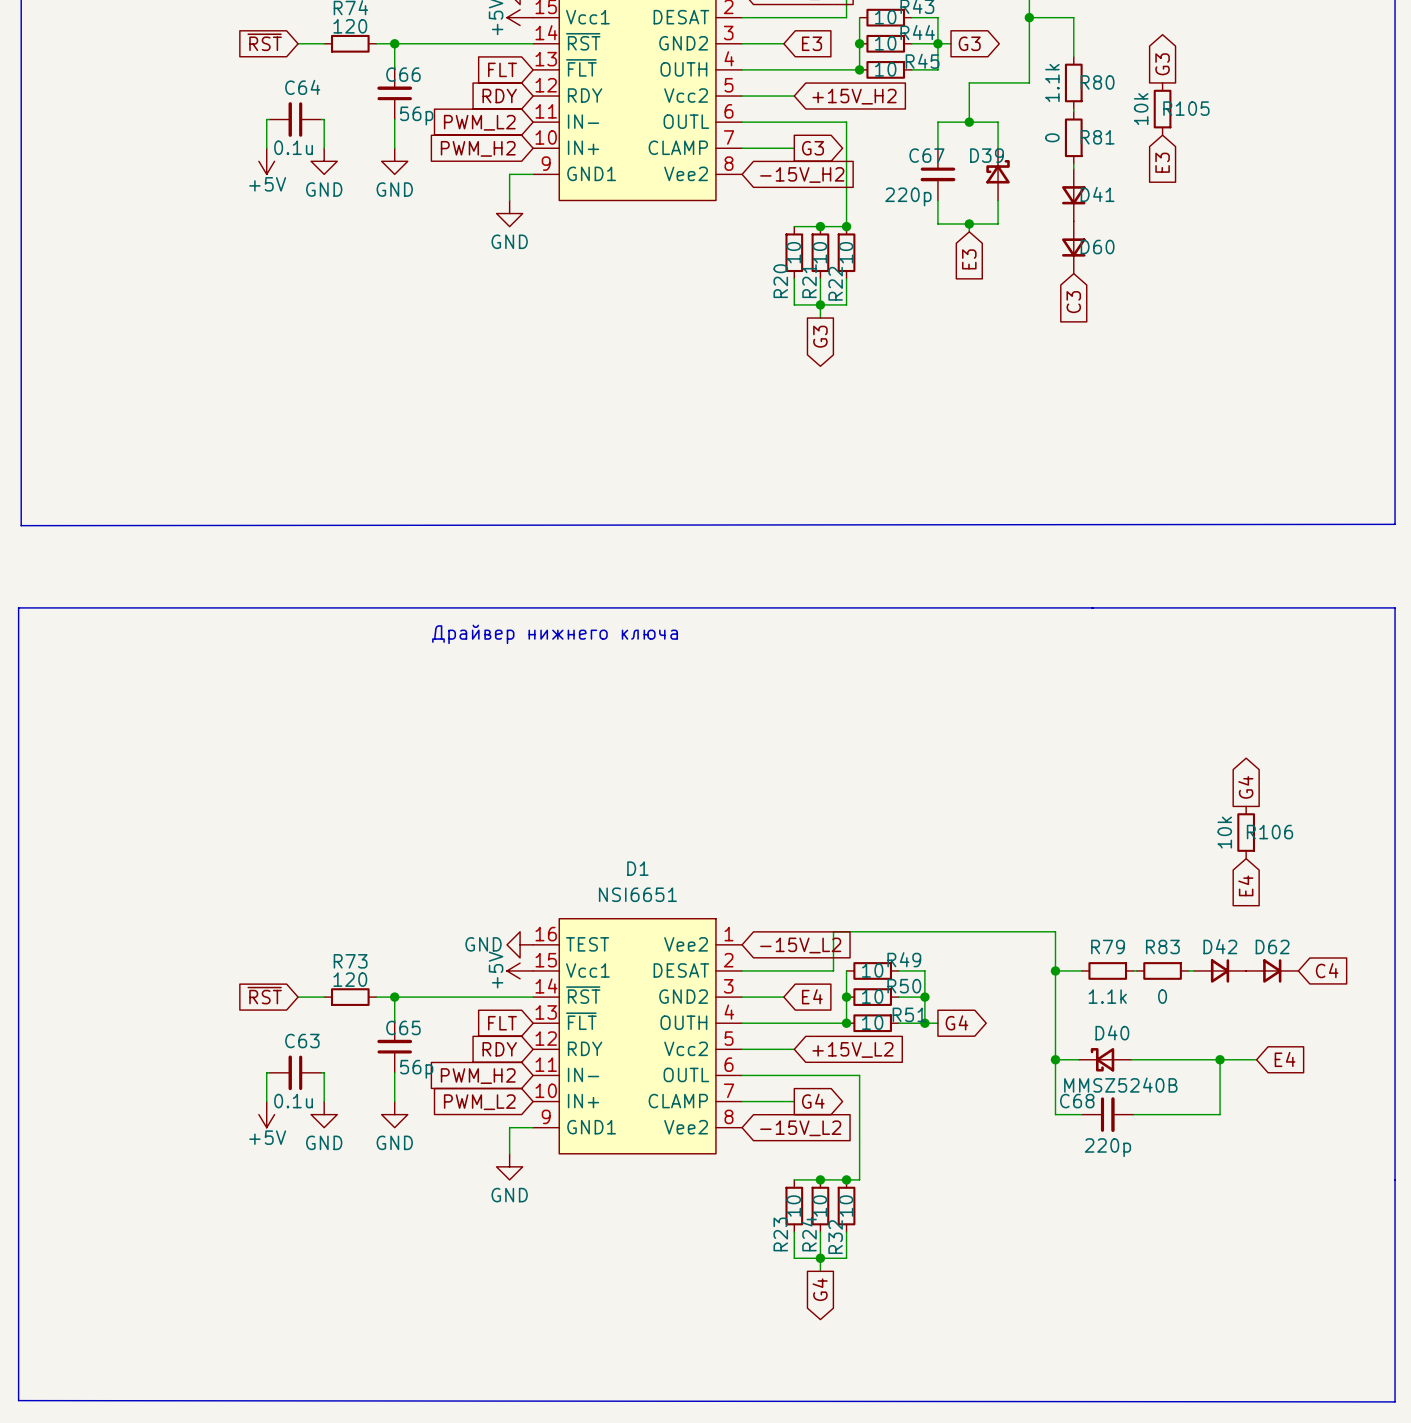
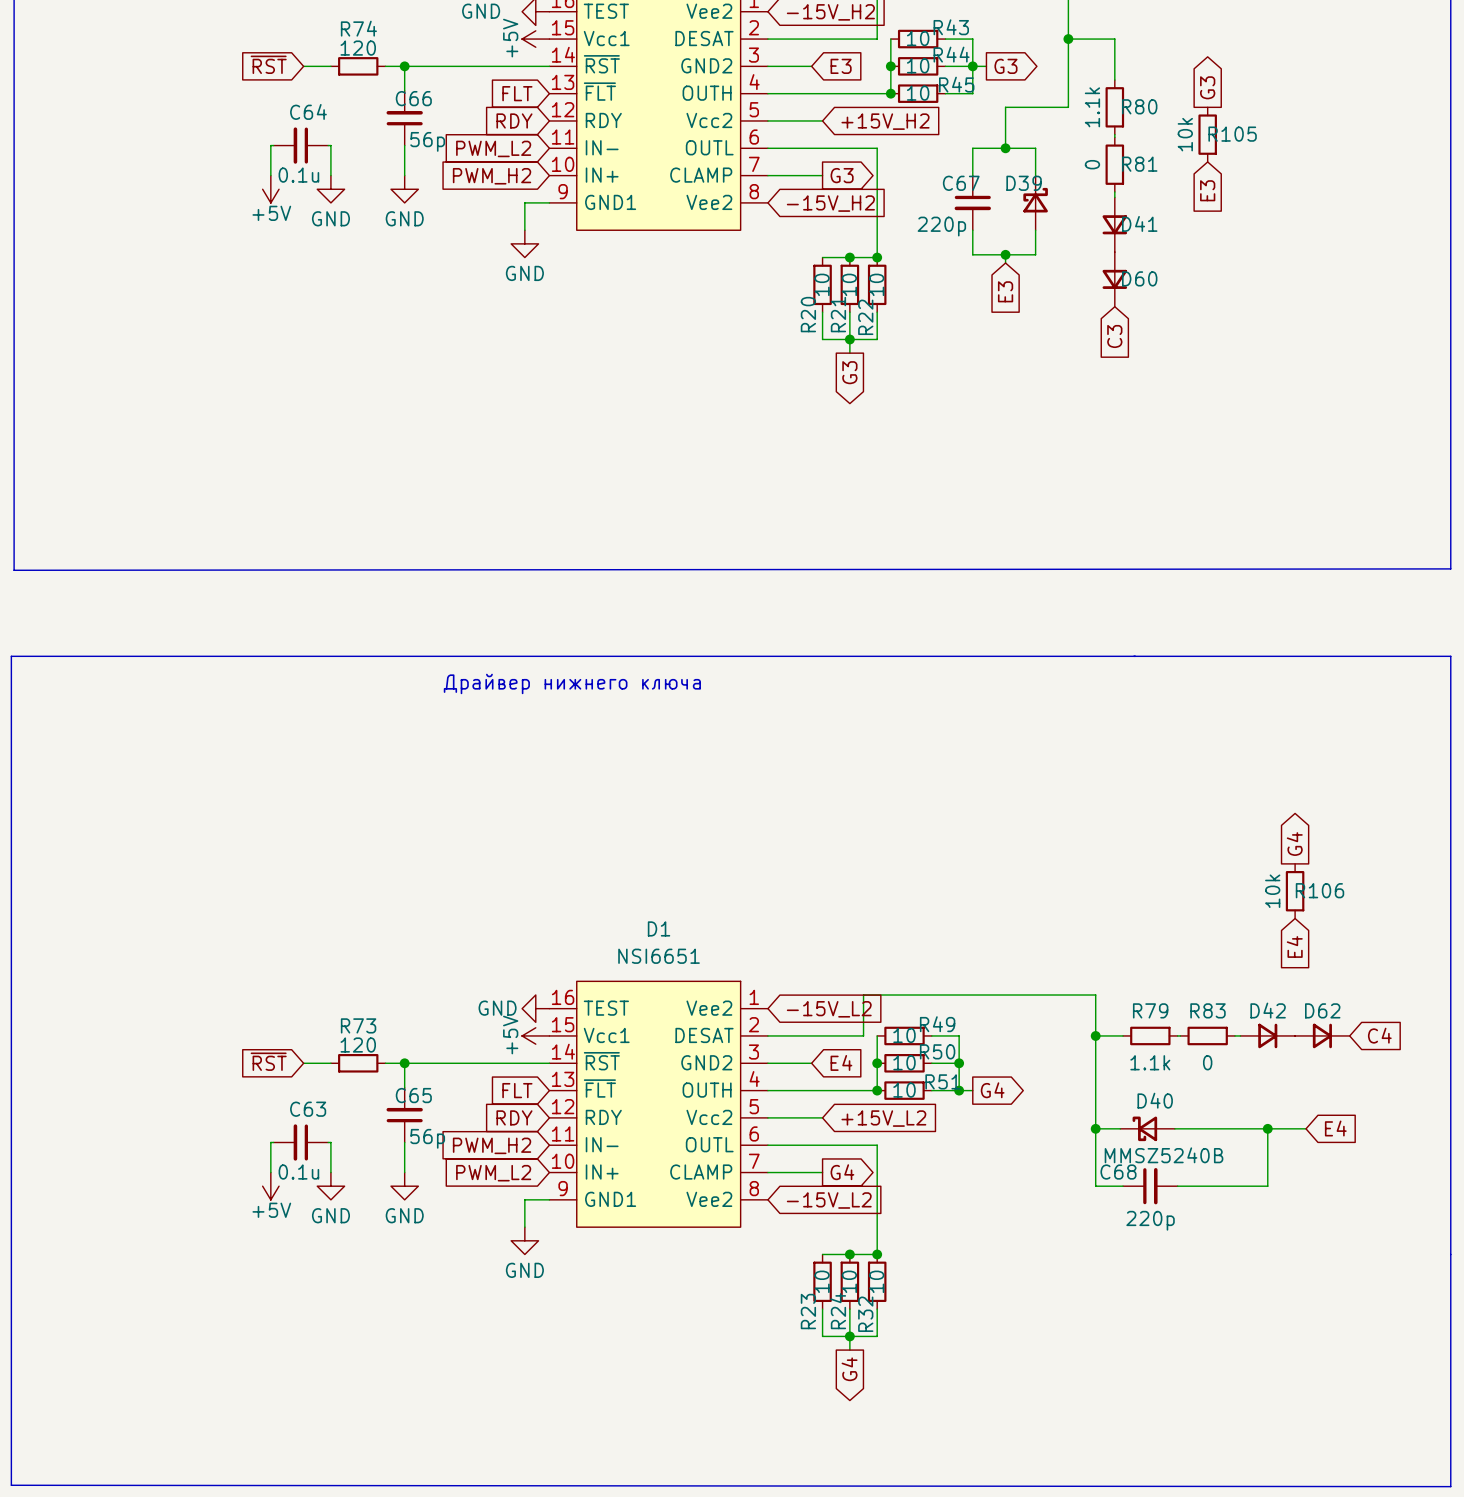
wire: (846, 1075) (859, 1075) (859, 1179) (846, 1179) -> (877, 1145) (877, 1254)

